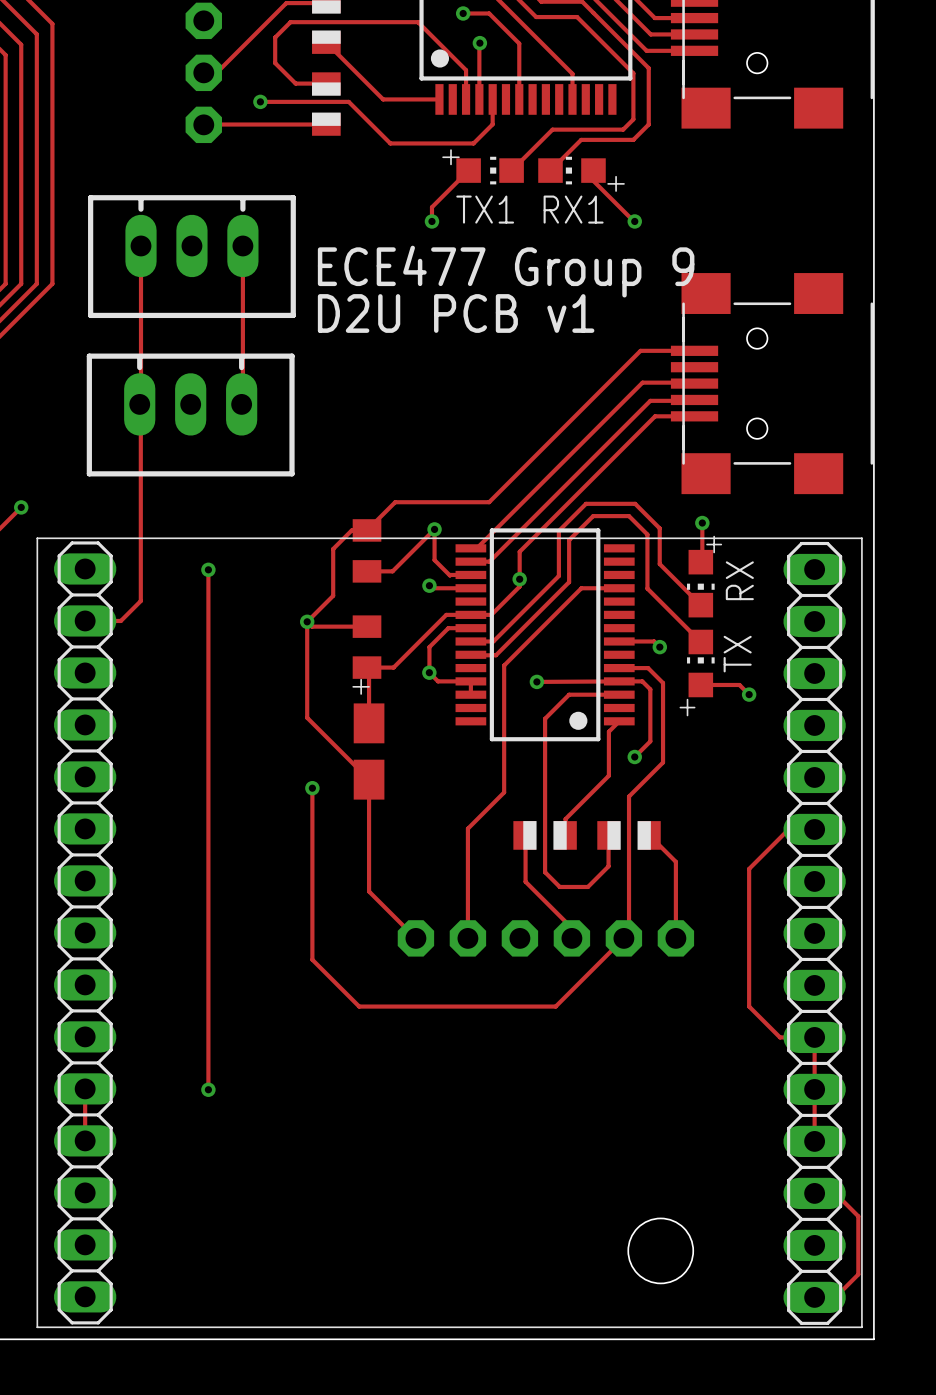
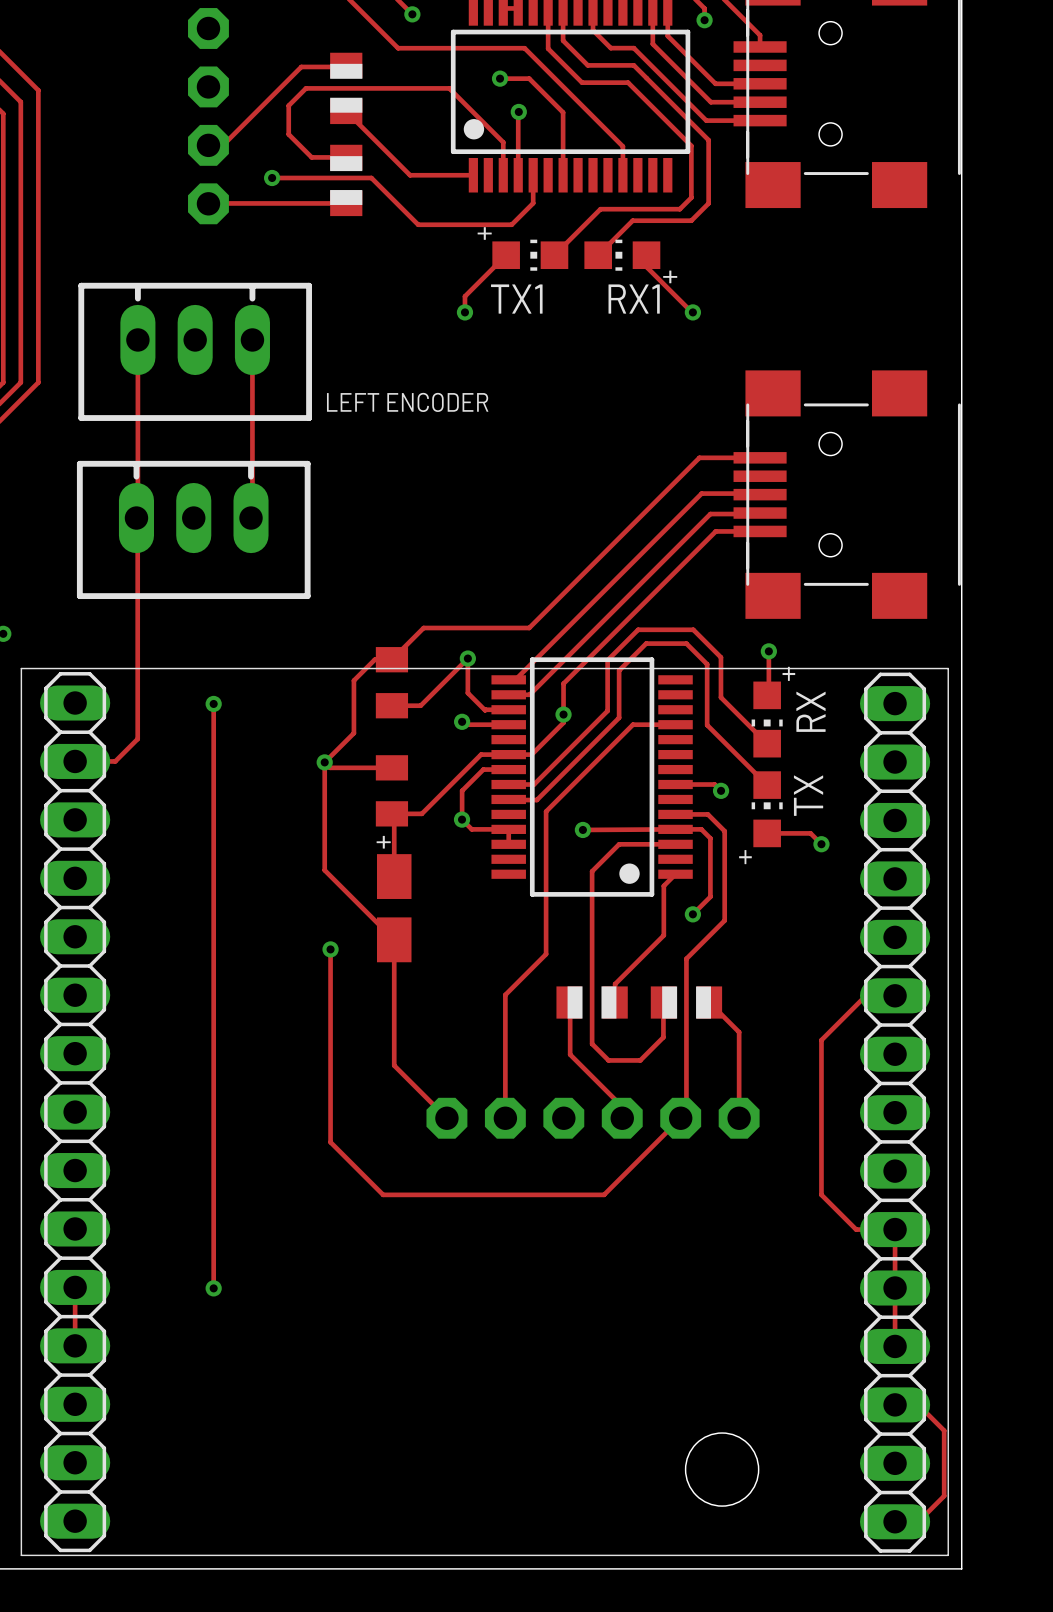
text: ECE477 Group 9 (506, 271) -> none
text: none -> LEFT ENCODER (407, 402)
text: D2U PCB v1 (456, 313) -> none

